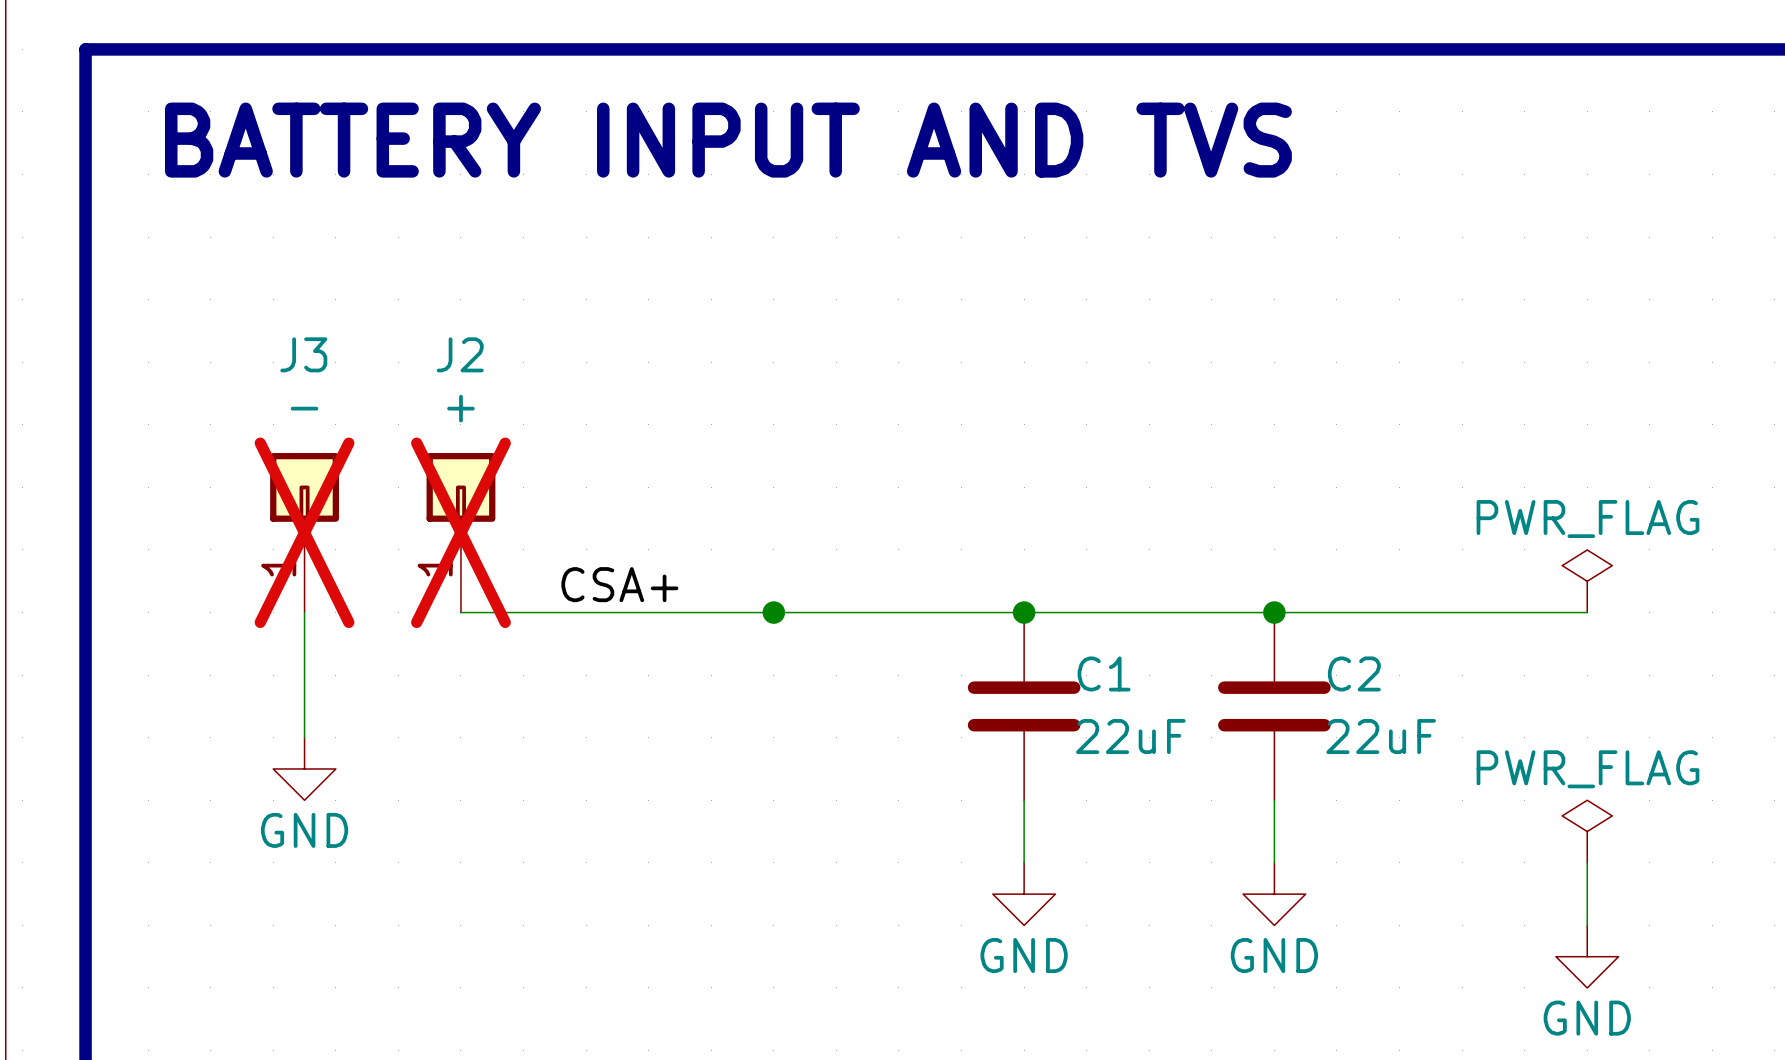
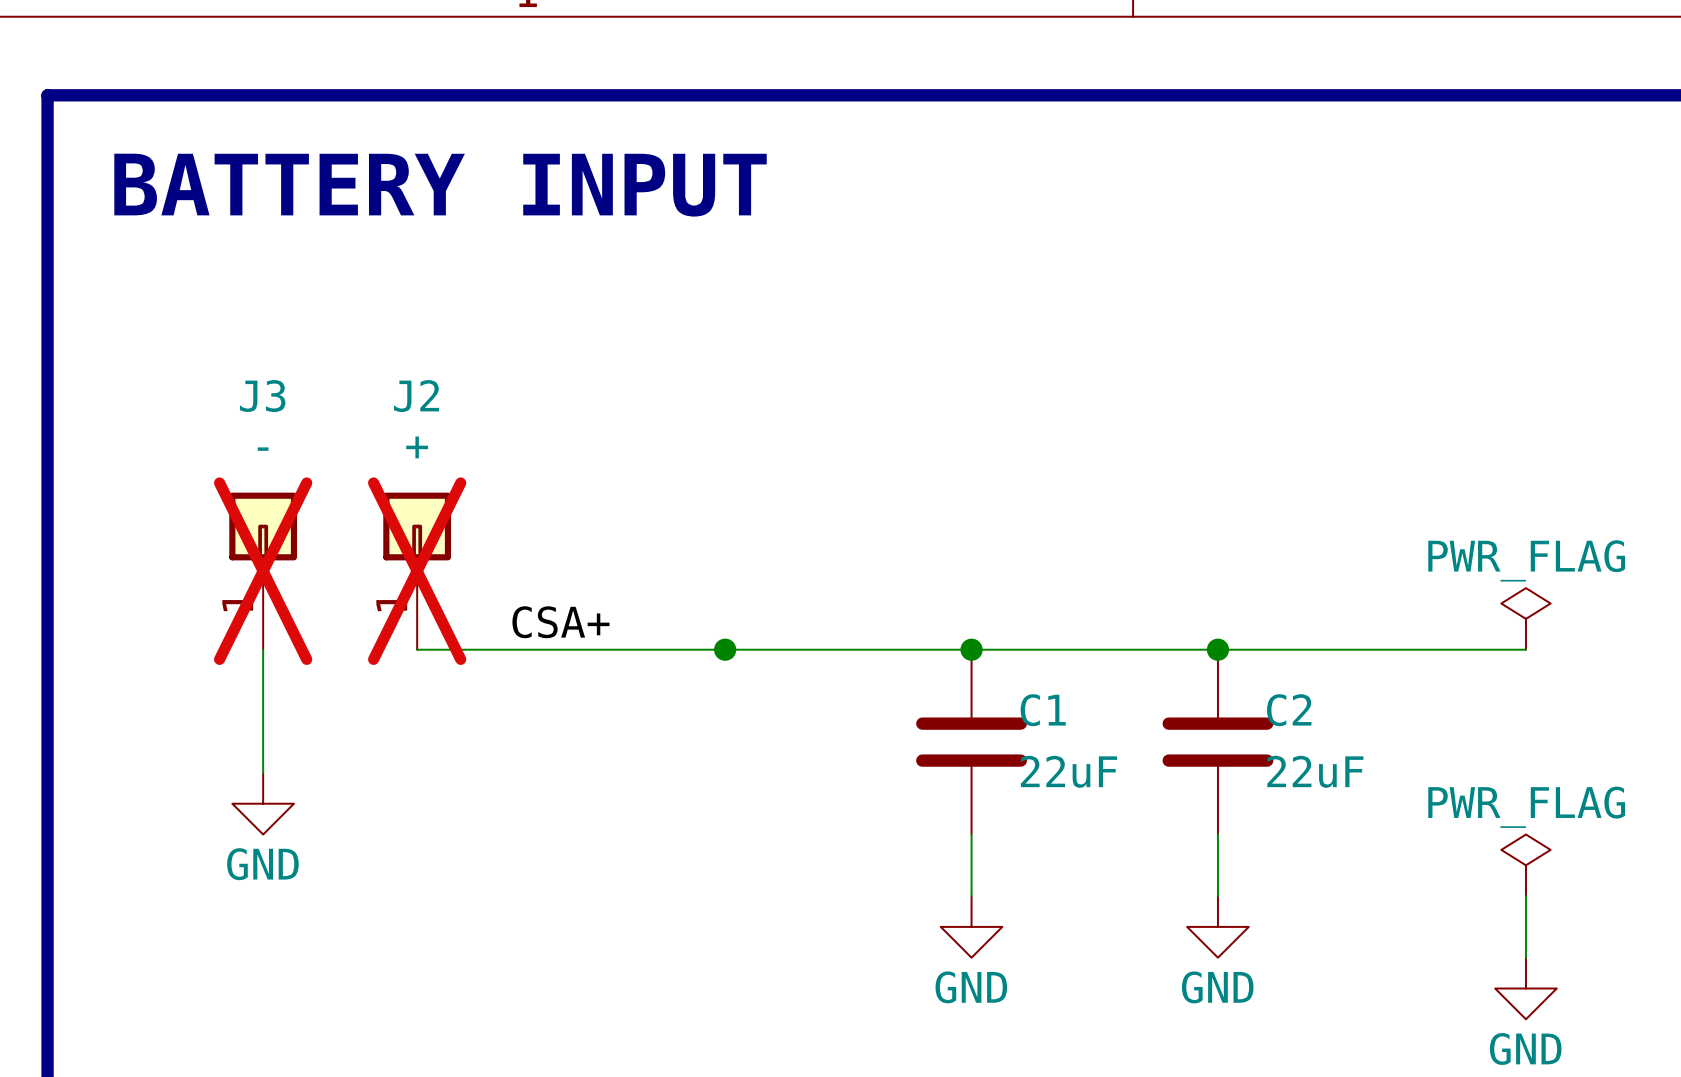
text: BATTERY INPUT AND TVS (728, 140) -> BATTERY INPUT (440, 185)

